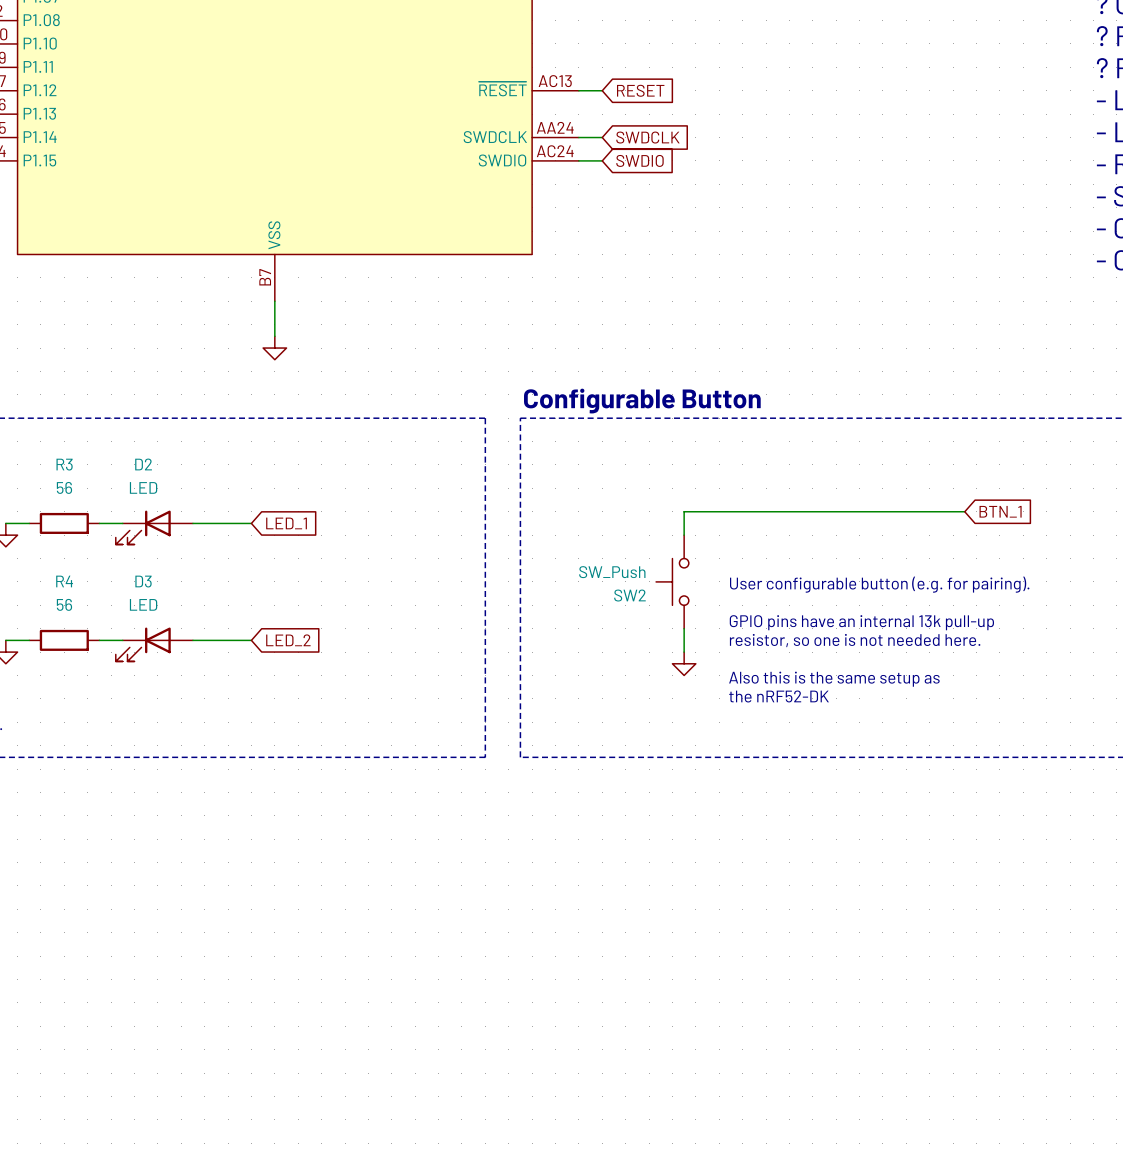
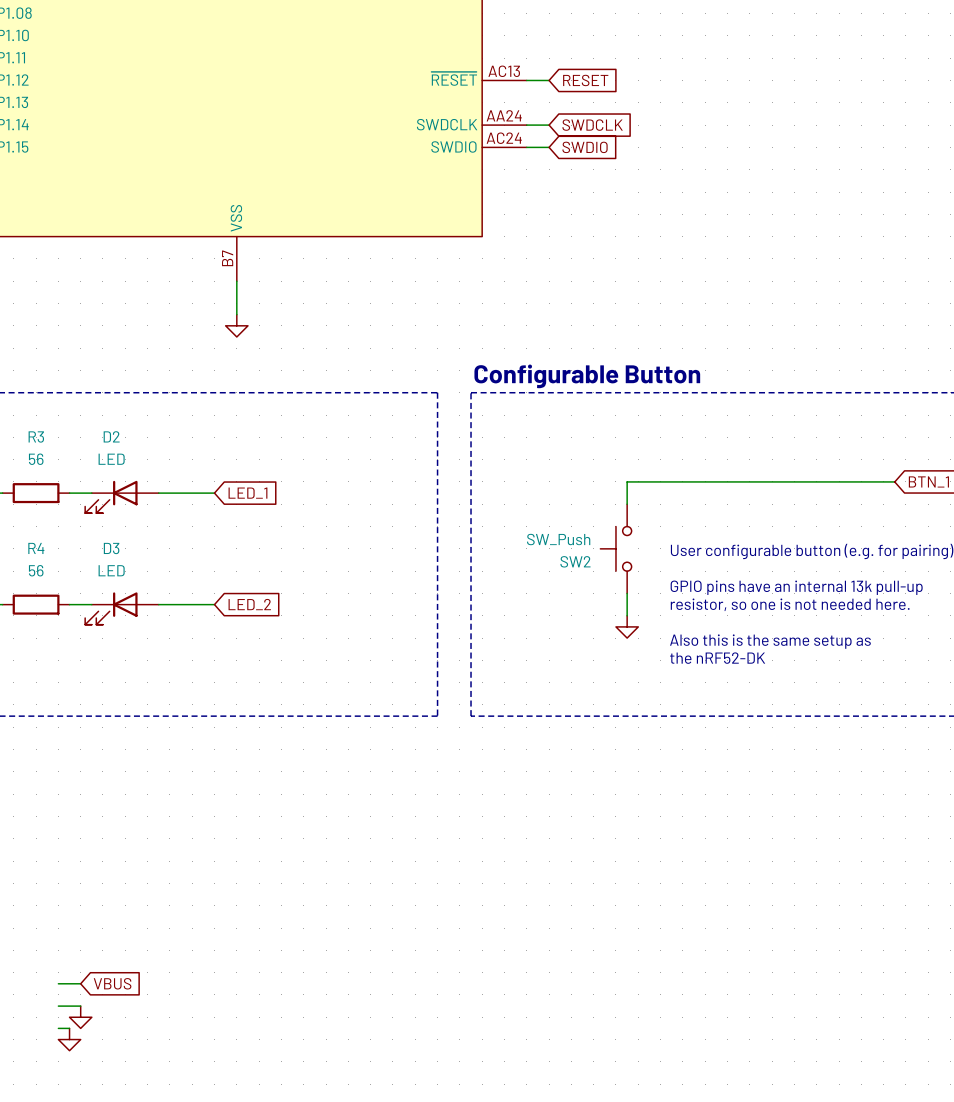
wire: none -> (58, 983) (80, 983)
global label: none -> VBUS (112, 983)
wire: none -> (58, 1006) (80, 1006)
power symbol: none -> (80, 1017)
wire: none -> (58, 1028) (69, 1028)
power symbol: none -> (69, 1039)

